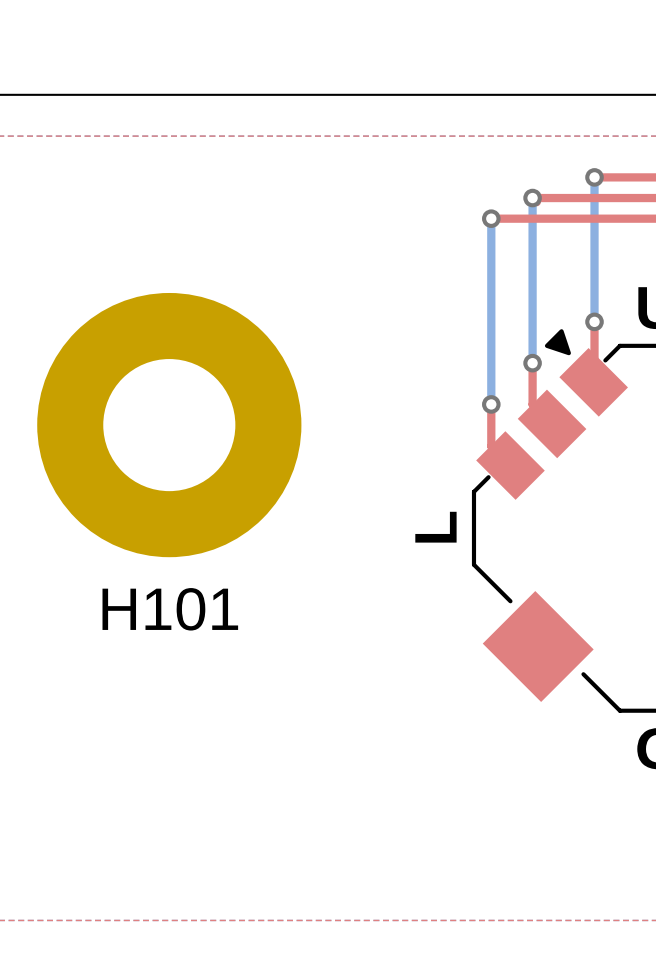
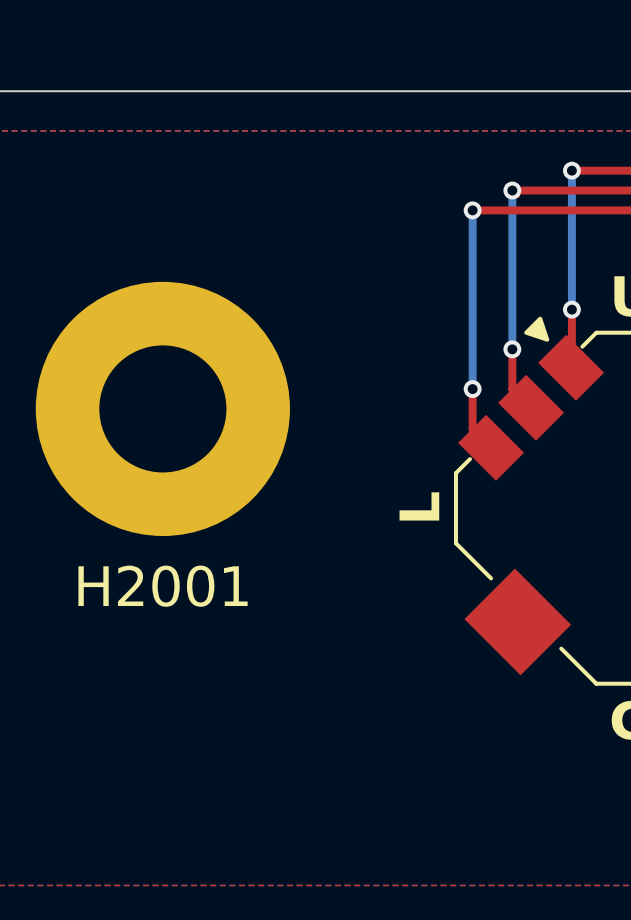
H101 name: H101 (170, 609) -> H2001 (163, 586)

